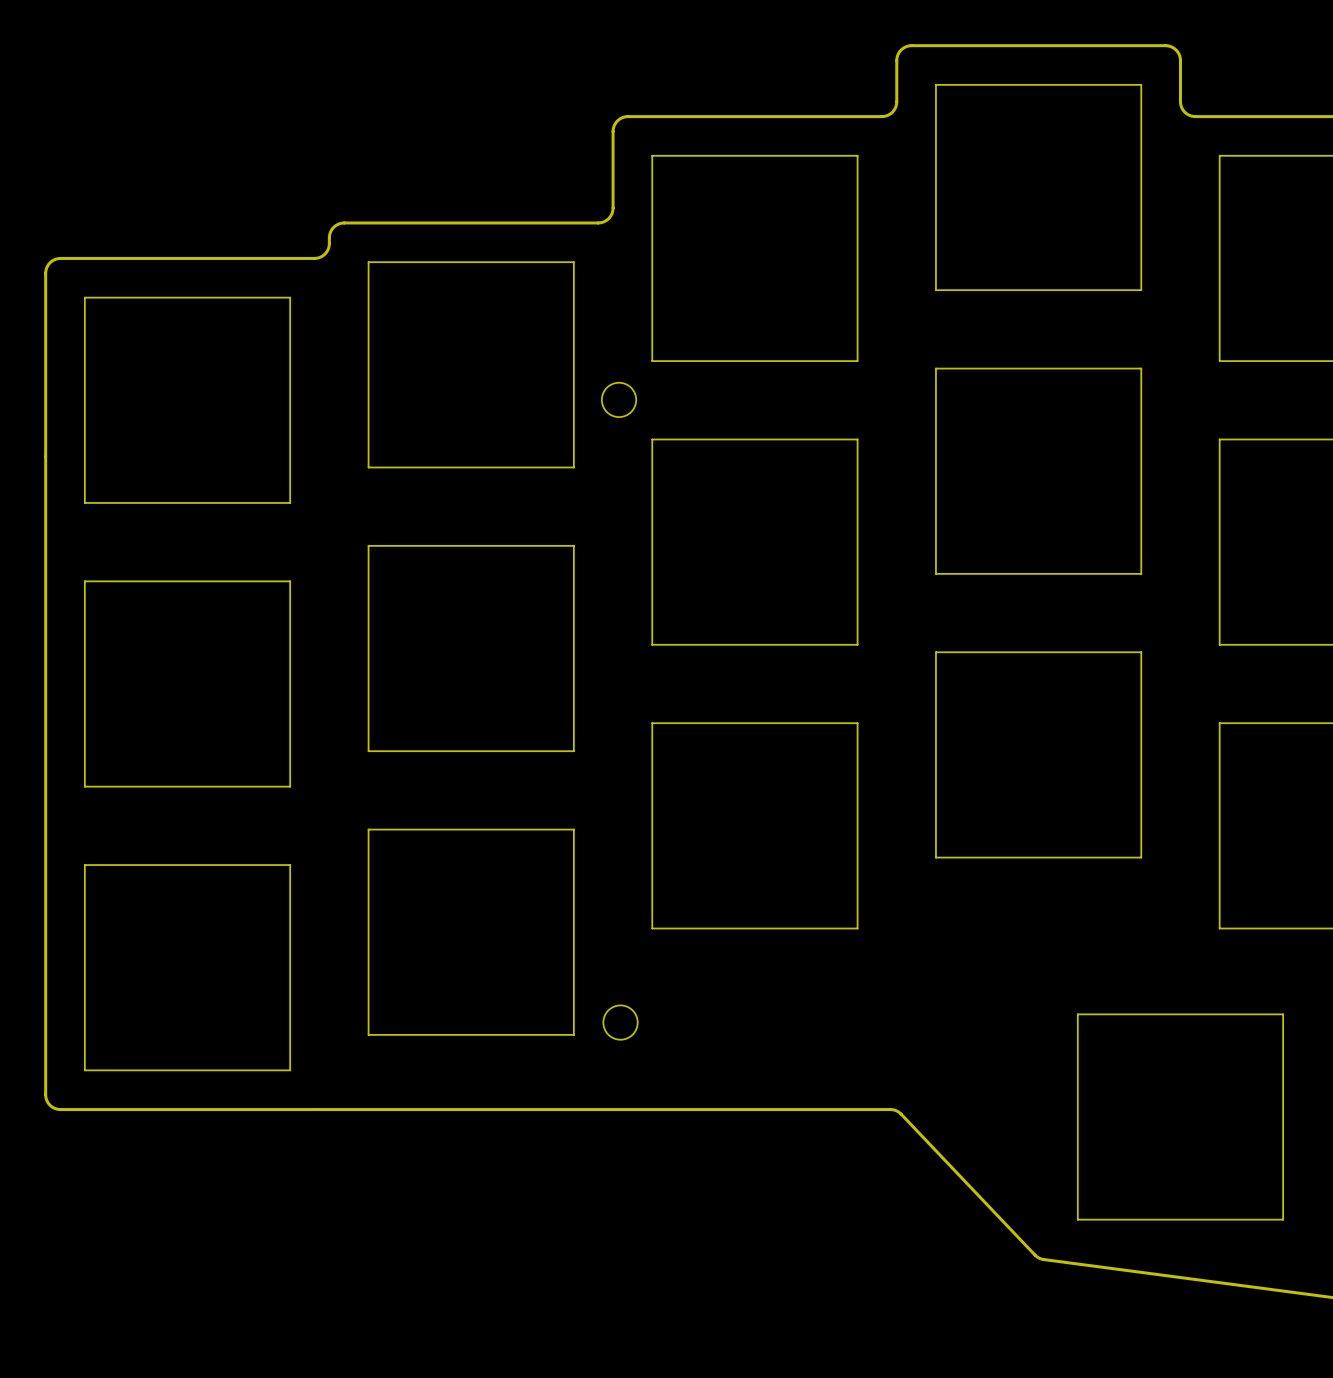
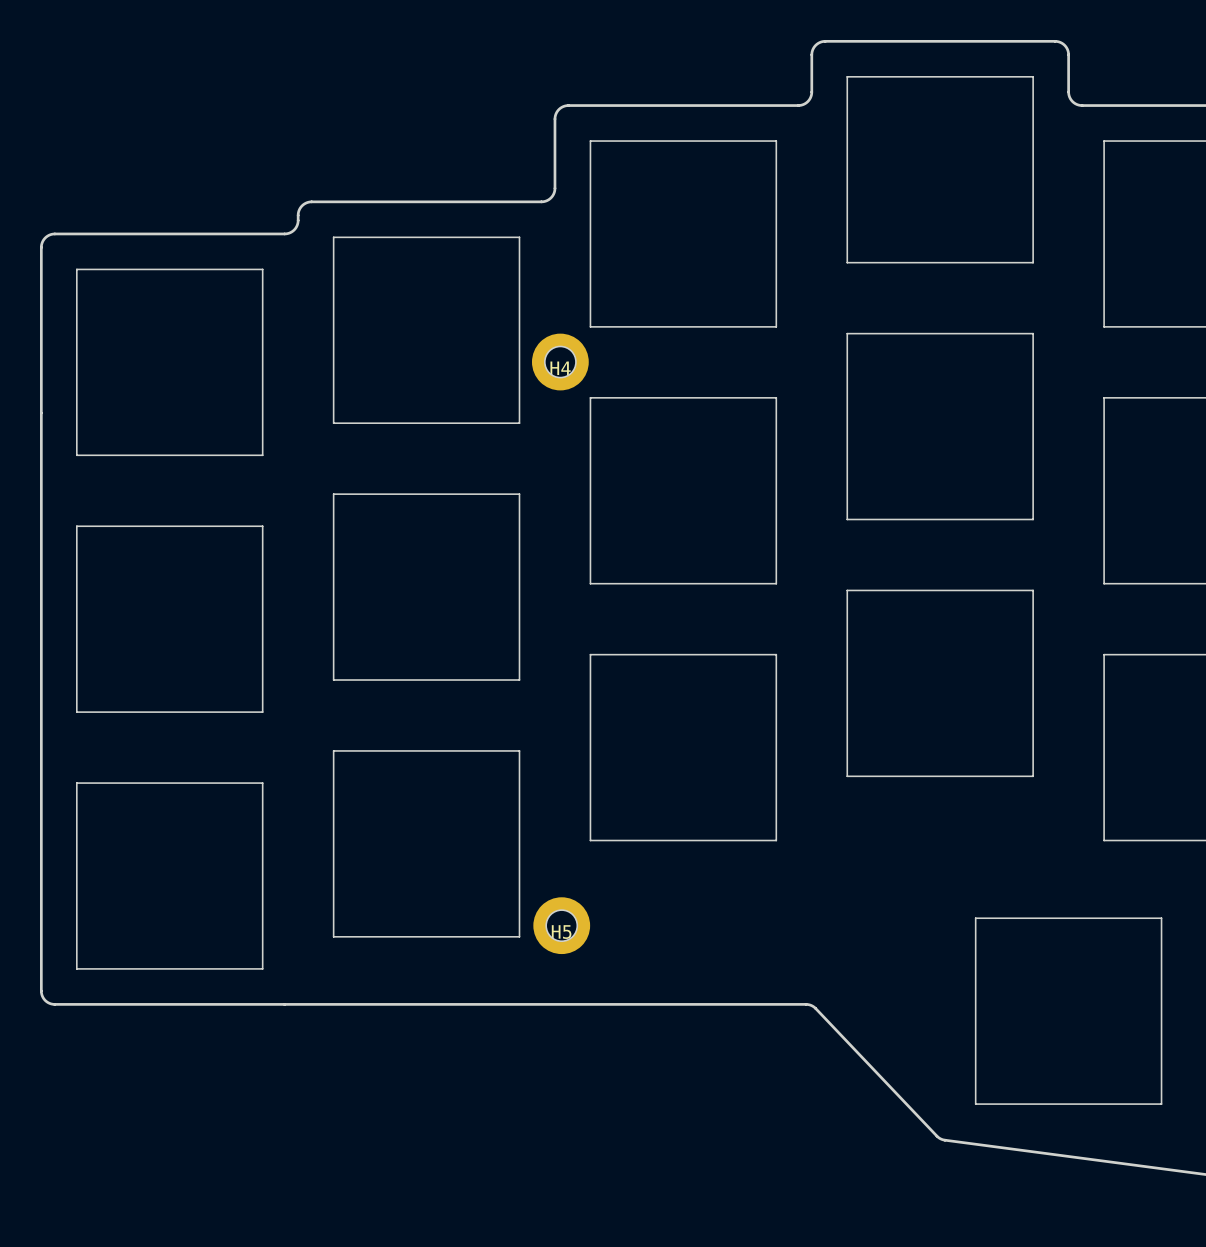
drawing: [601, 382, 637, 418] -> none
H4: none -> (560, 362)
drawing: [602, 1004, 639, 1041] -> none
H5: none -> (561, 925)

